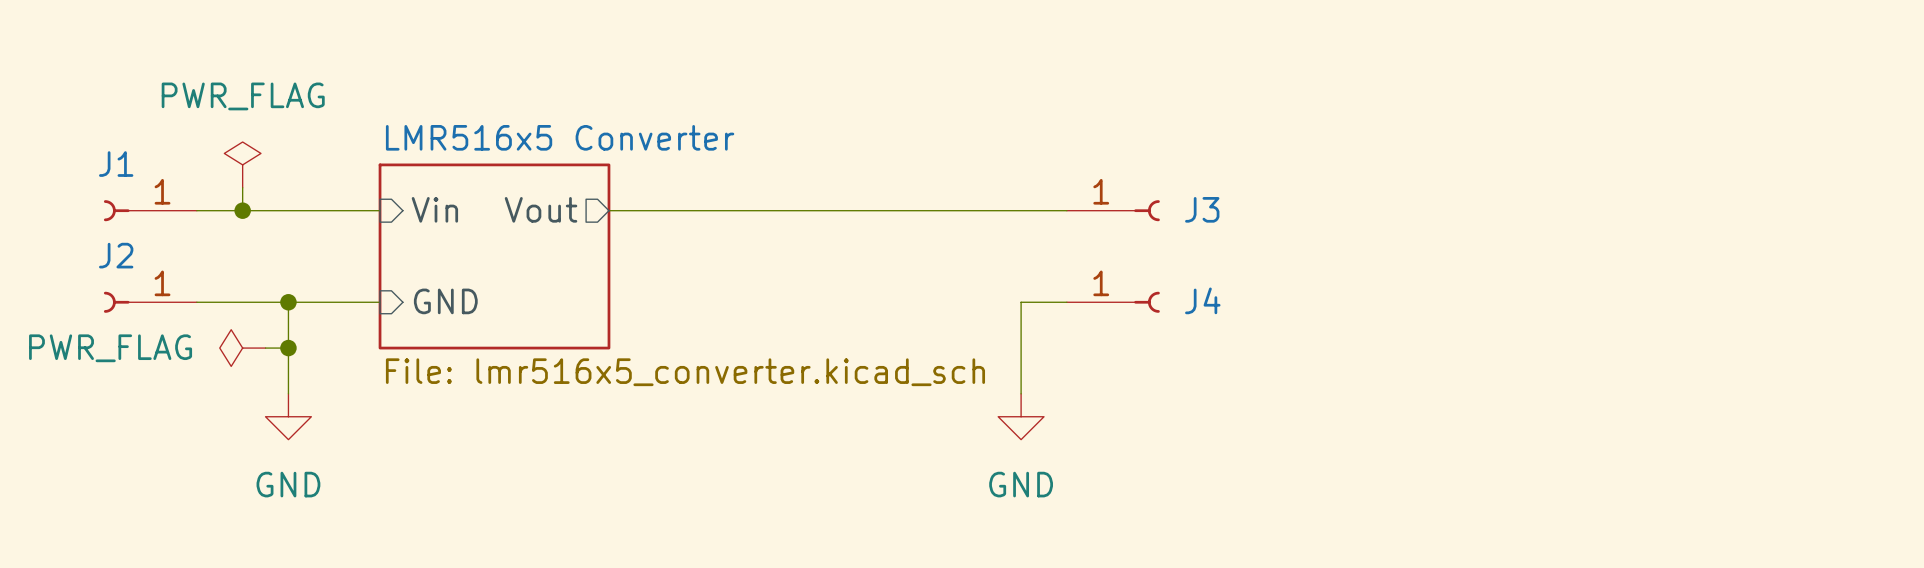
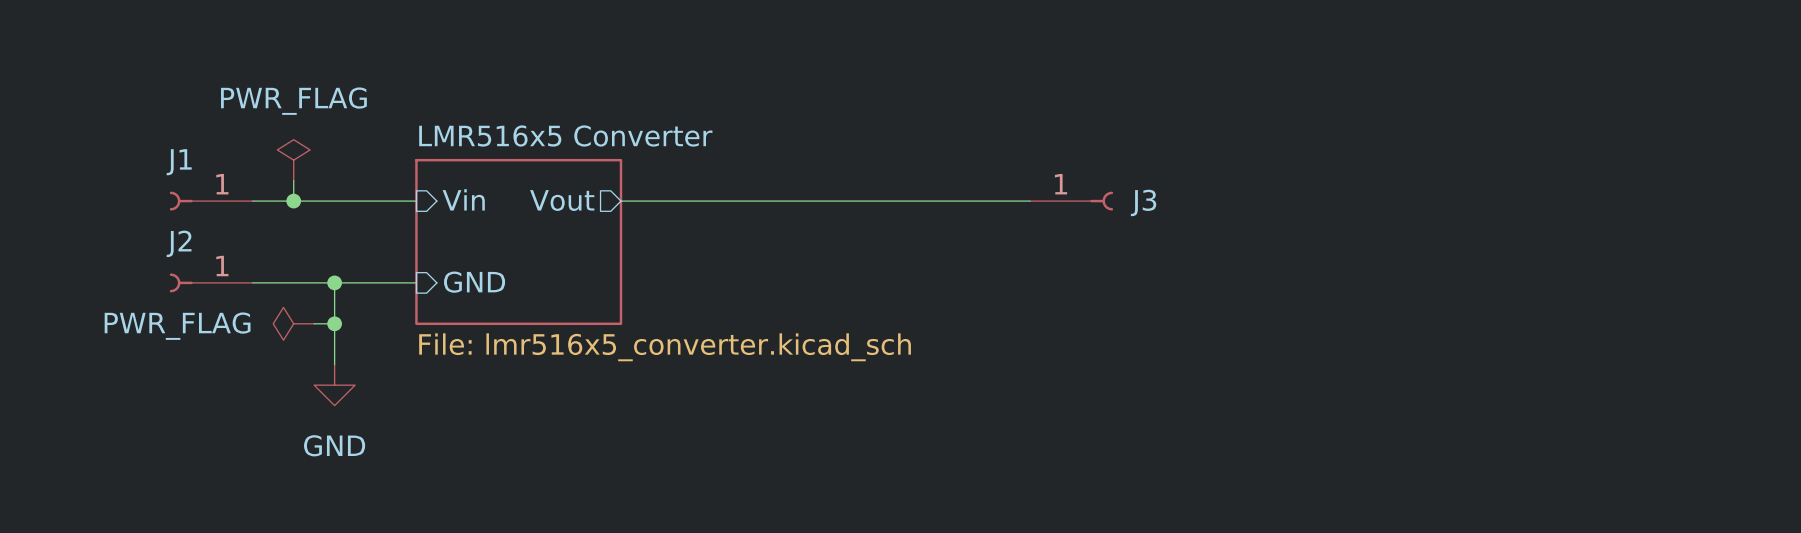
wire: (1066, 302) (1021, 302) (1021, 393) -> none
J4: (1113, 302) -> none
power symbol: GND (1021, 416) -> none

